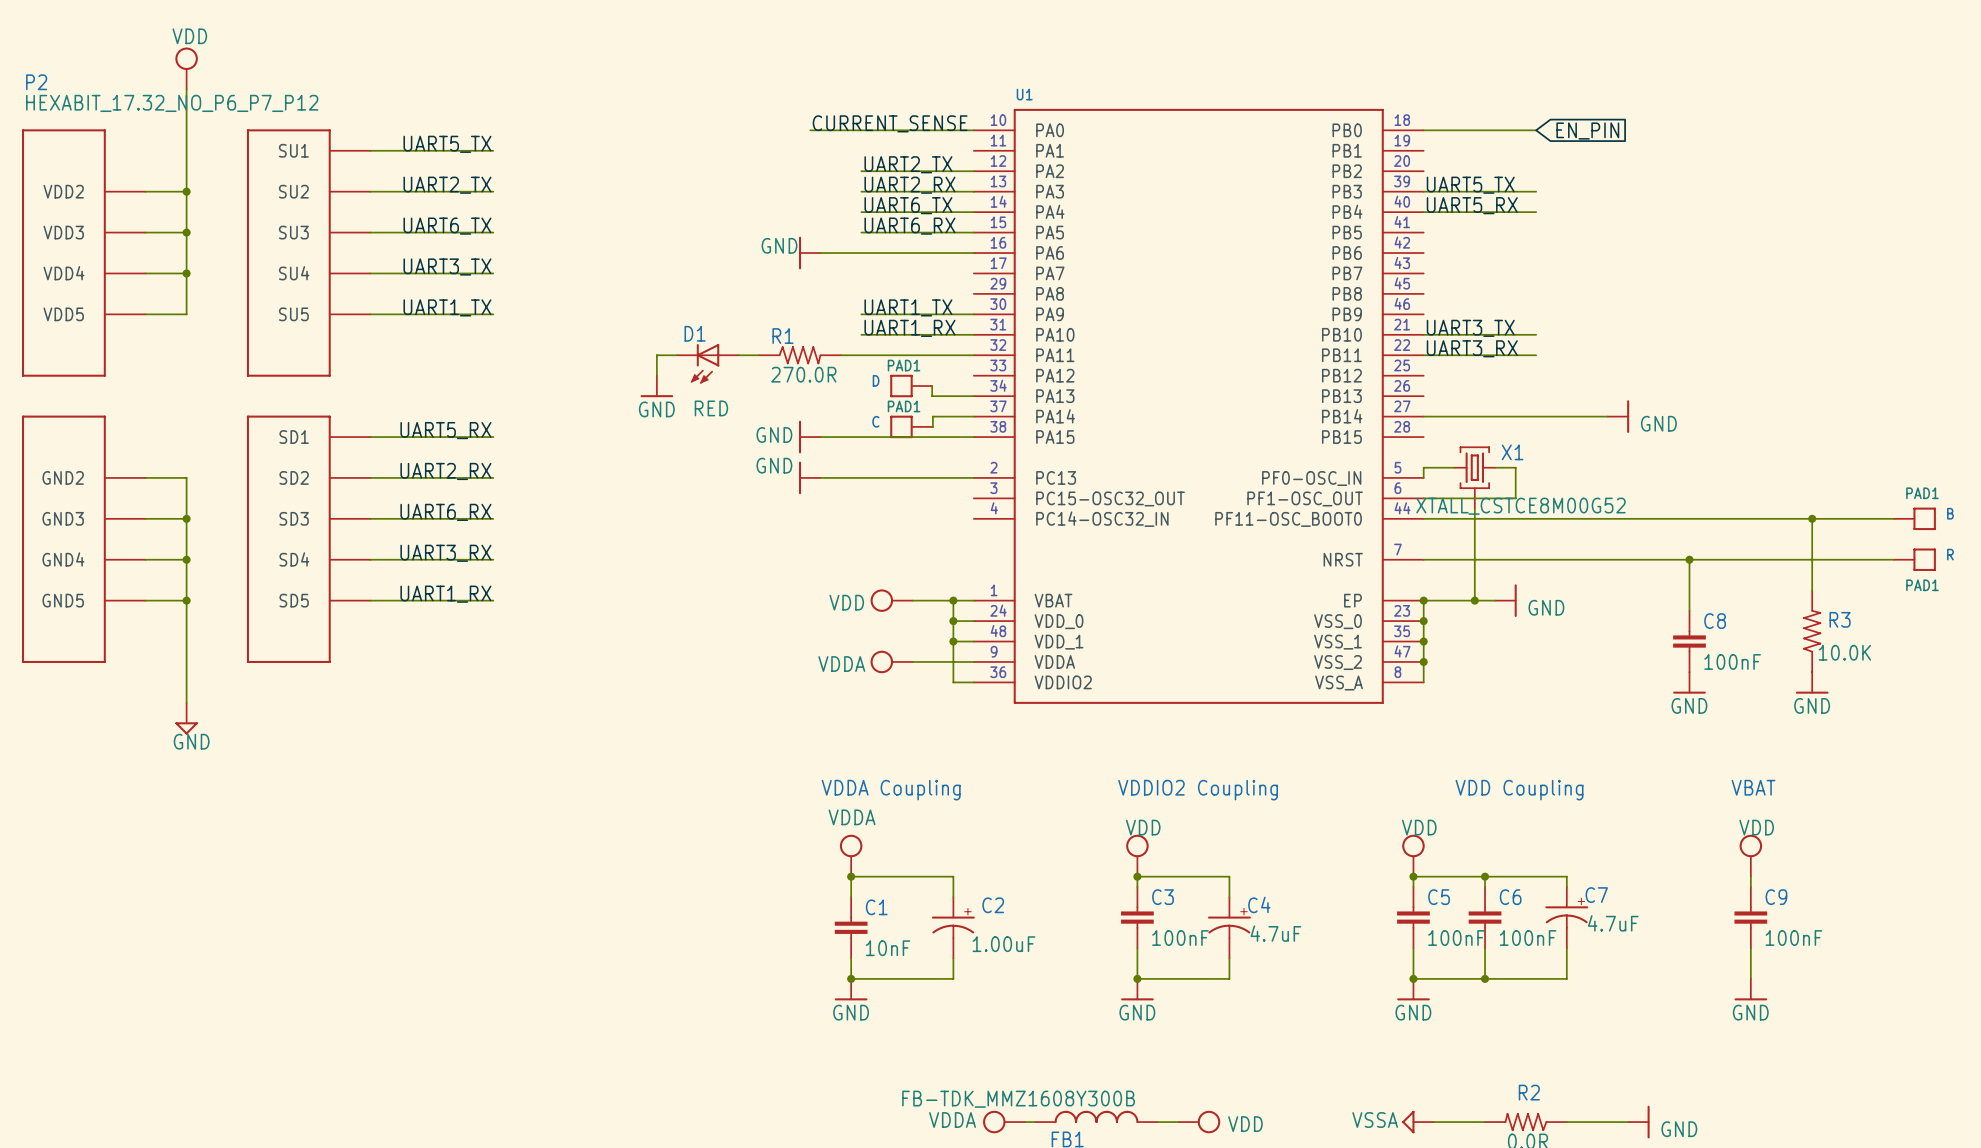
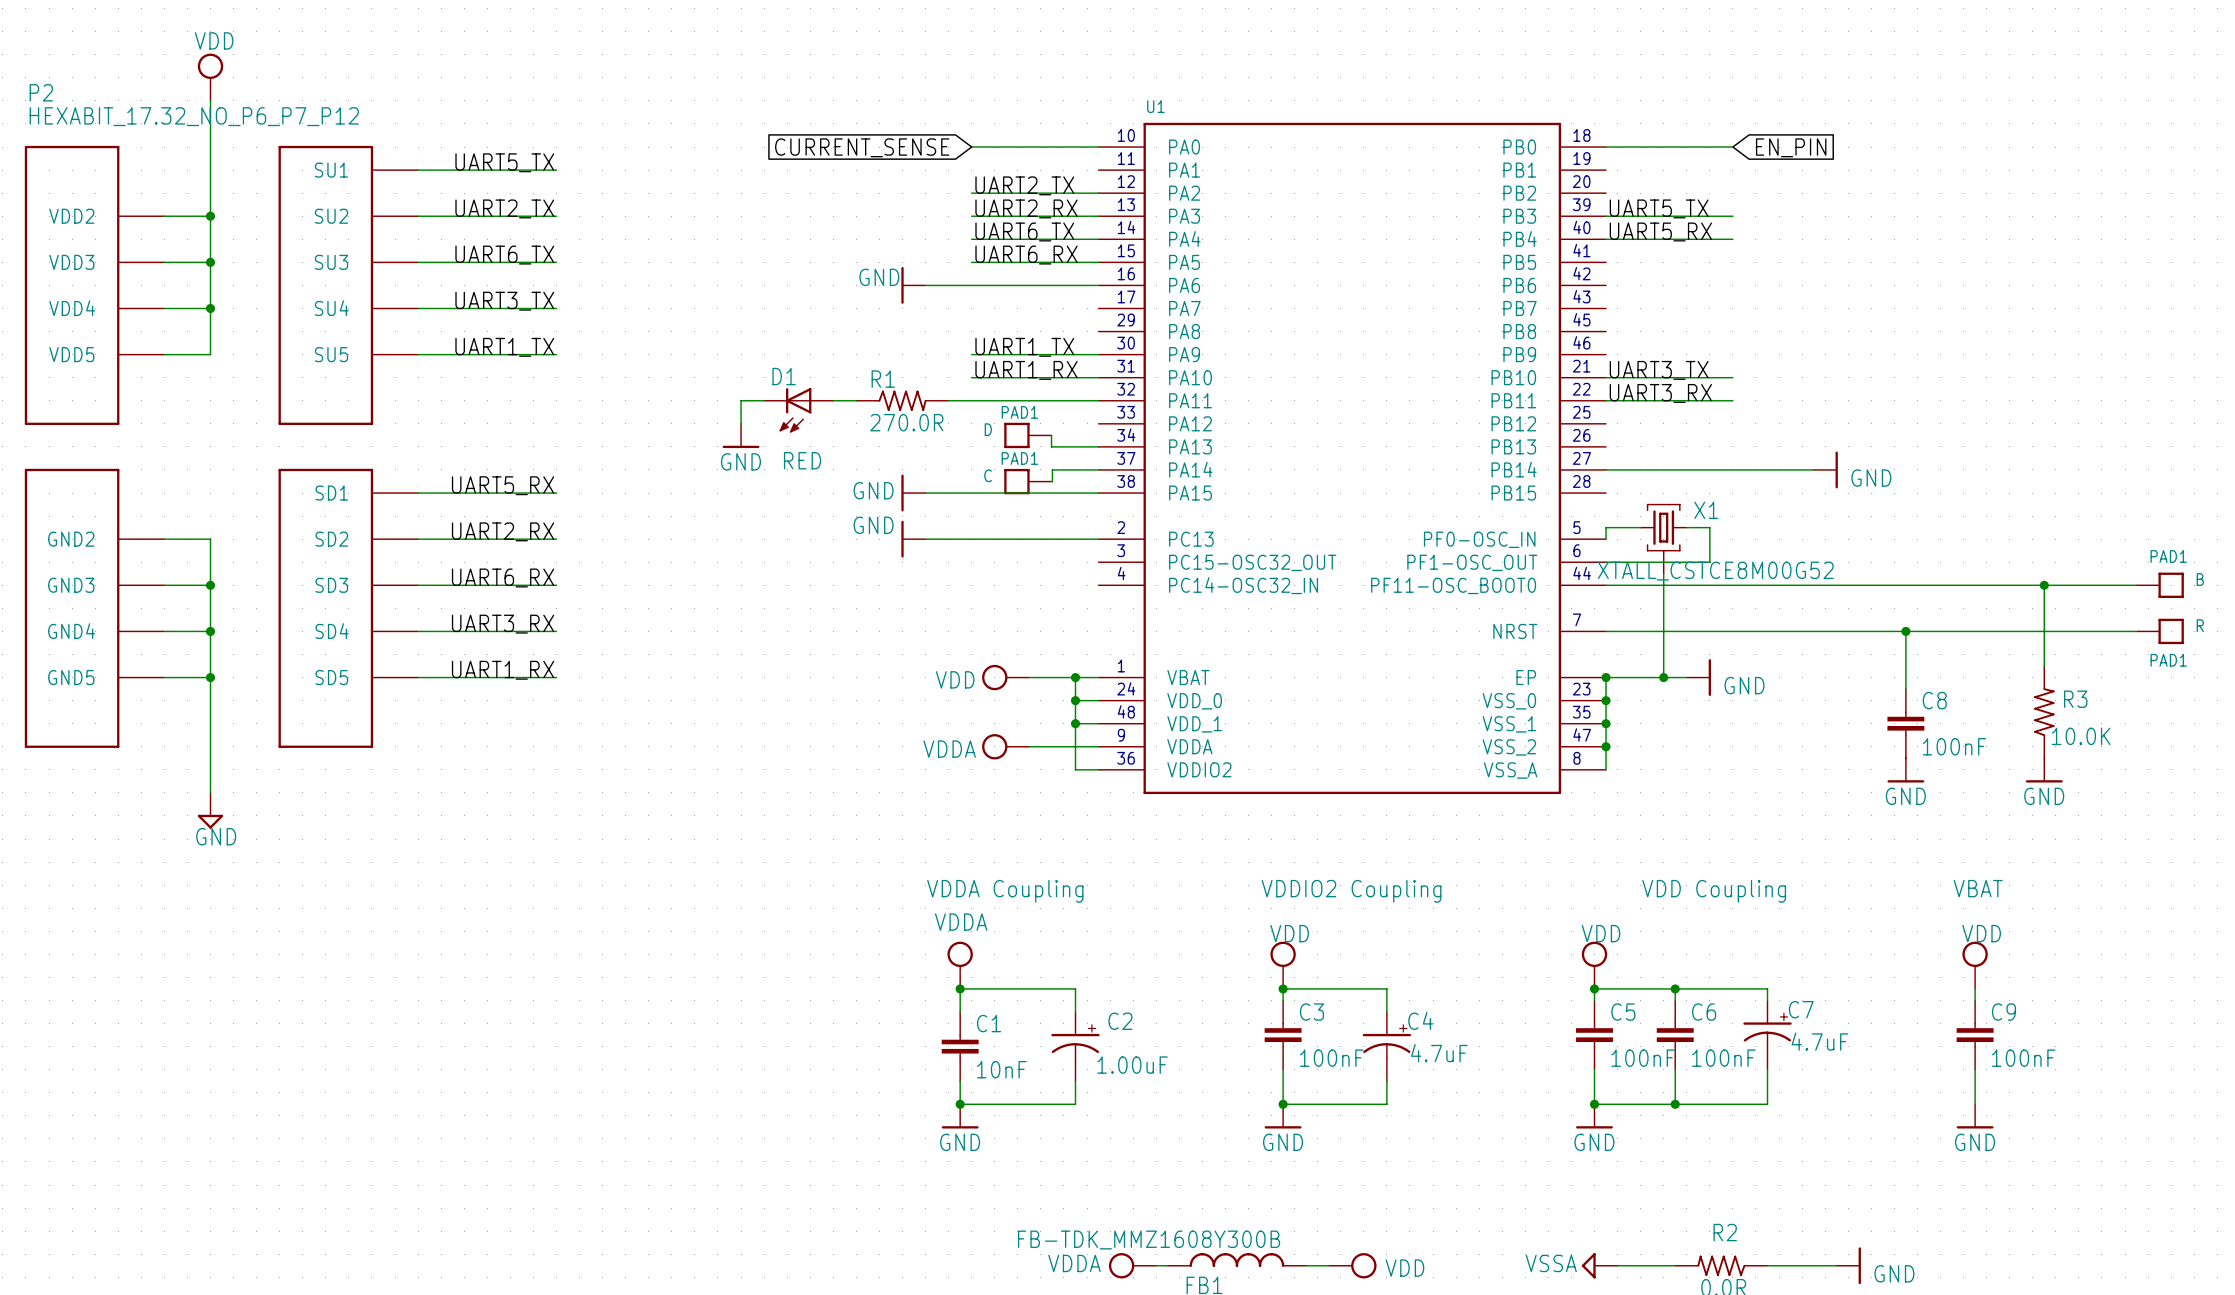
label: CURRENT_SENSE (890, 123) -> none
wire: (810, 130) (861, 130) -> none
global label: none -> CURRENT_SENSE (862, 147)

